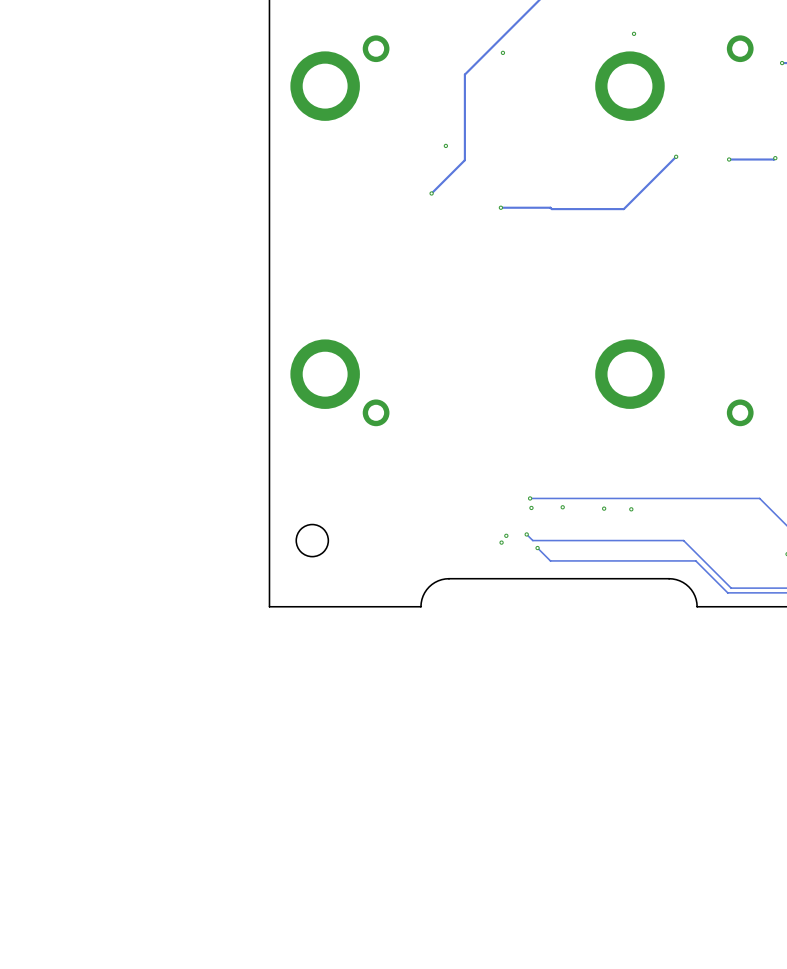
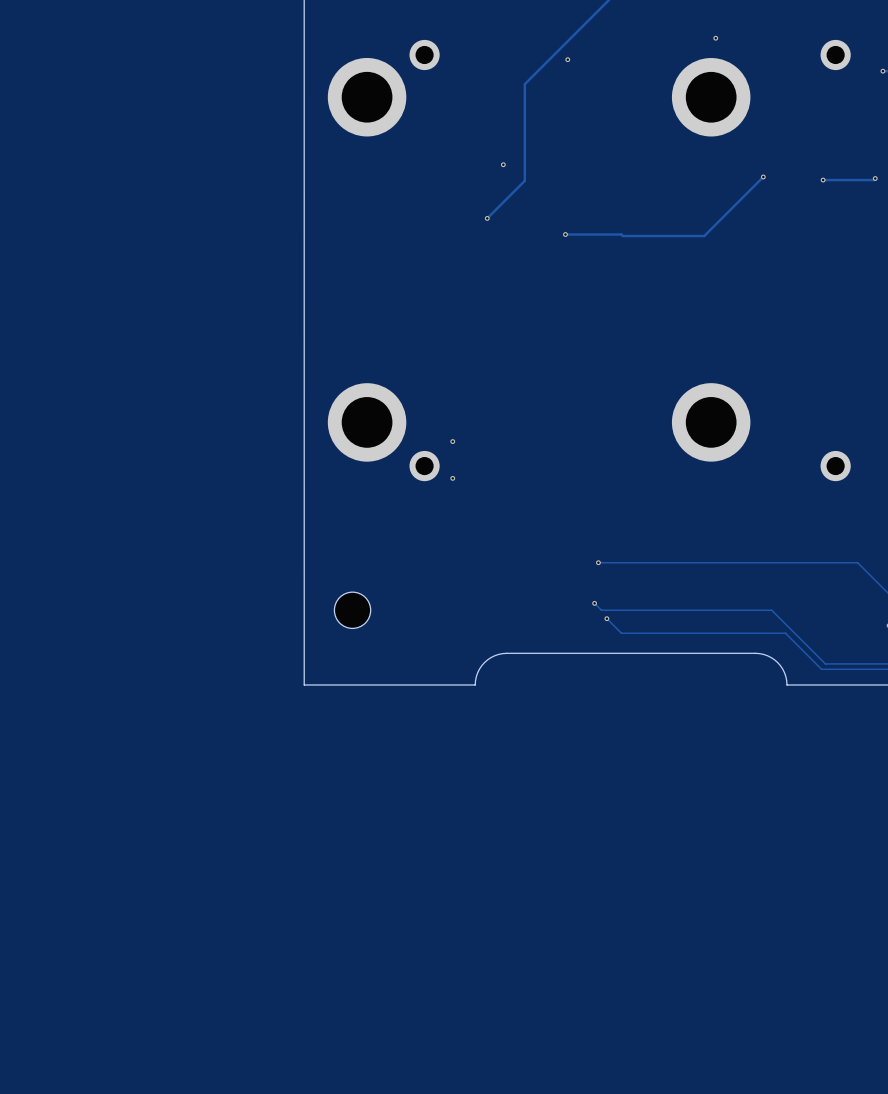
via: none -> (452, 441)
via: none -> (452, 478)
via: (531, 507) -> none
via: (562, 507) -> none
via: (604, 508) -> none
via: (631, 509) -> none
via: (506, 535) -> none
via: (501, 542) -> none

